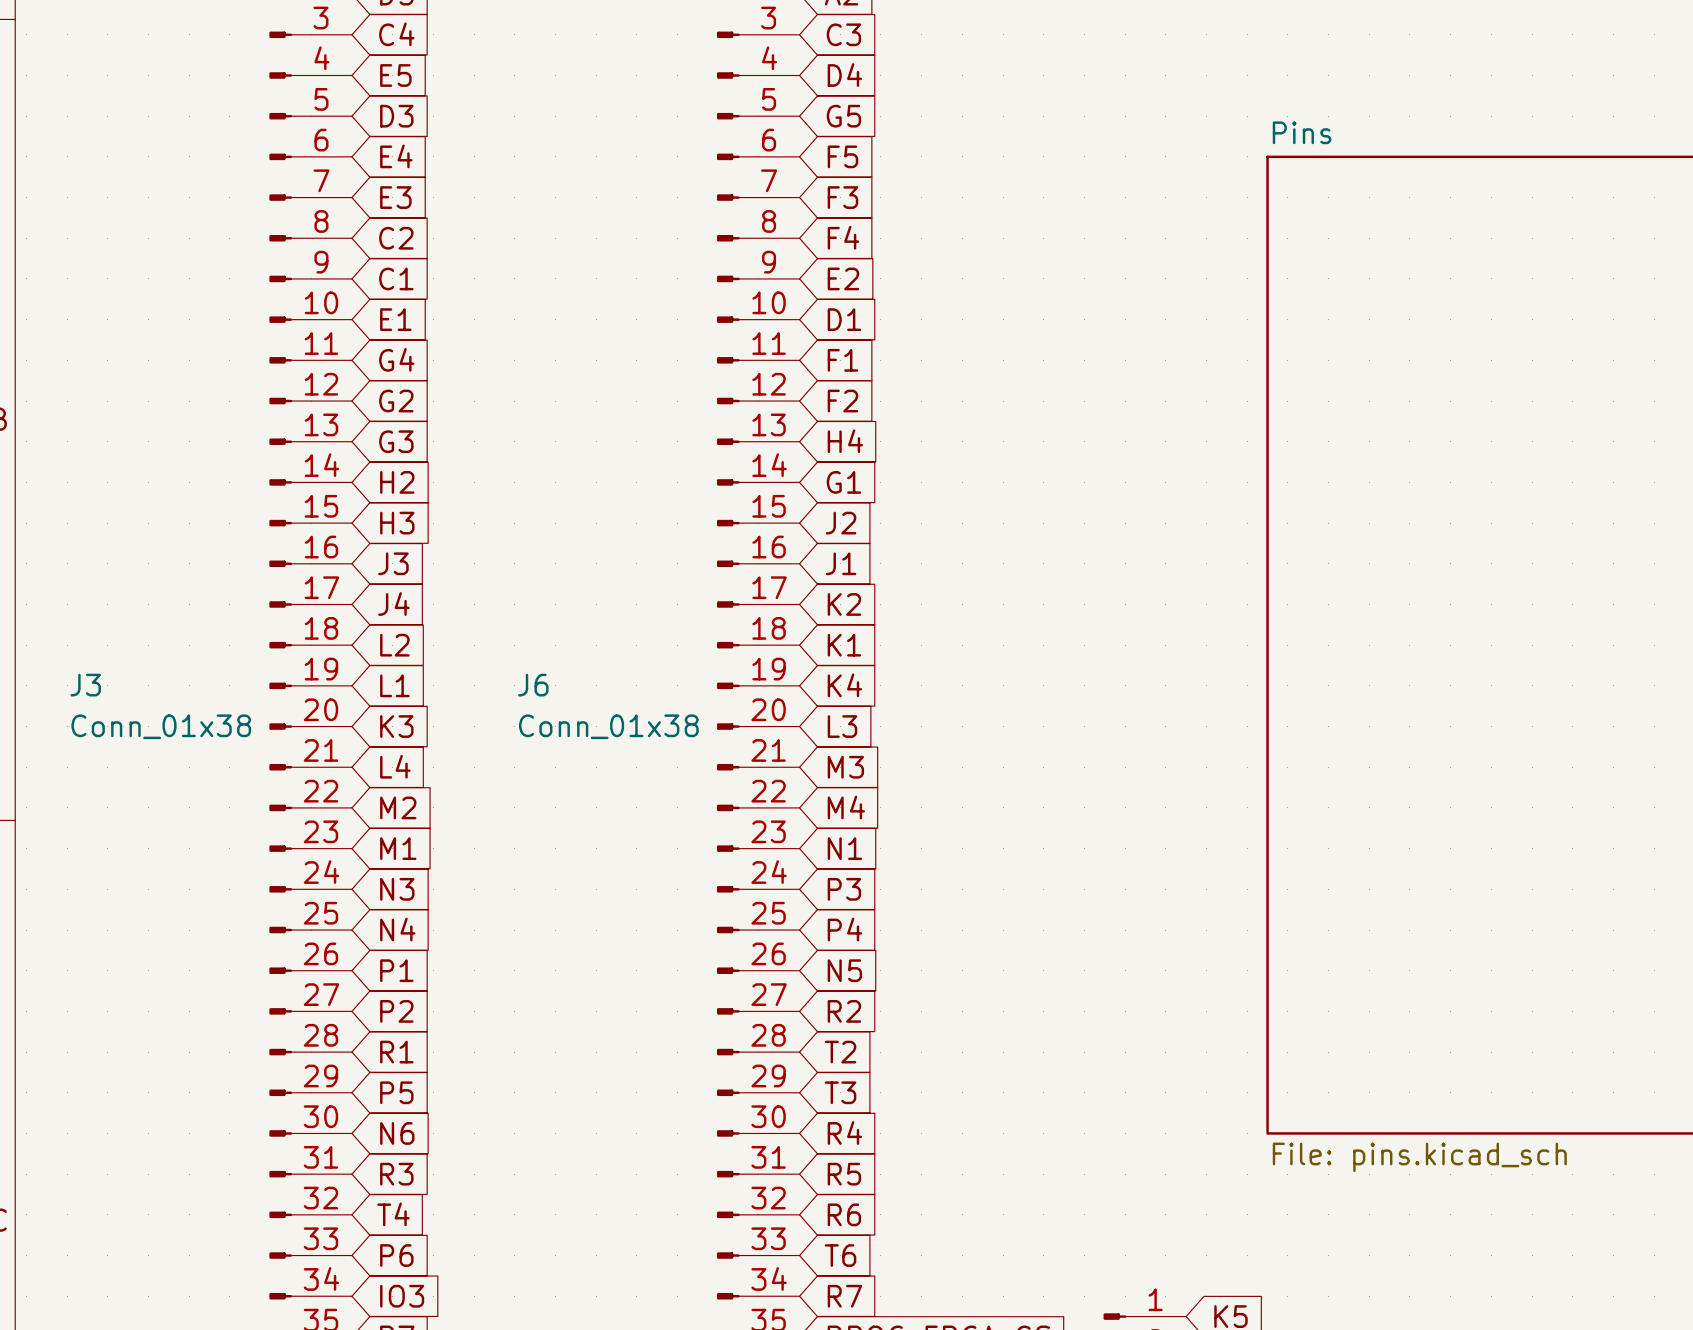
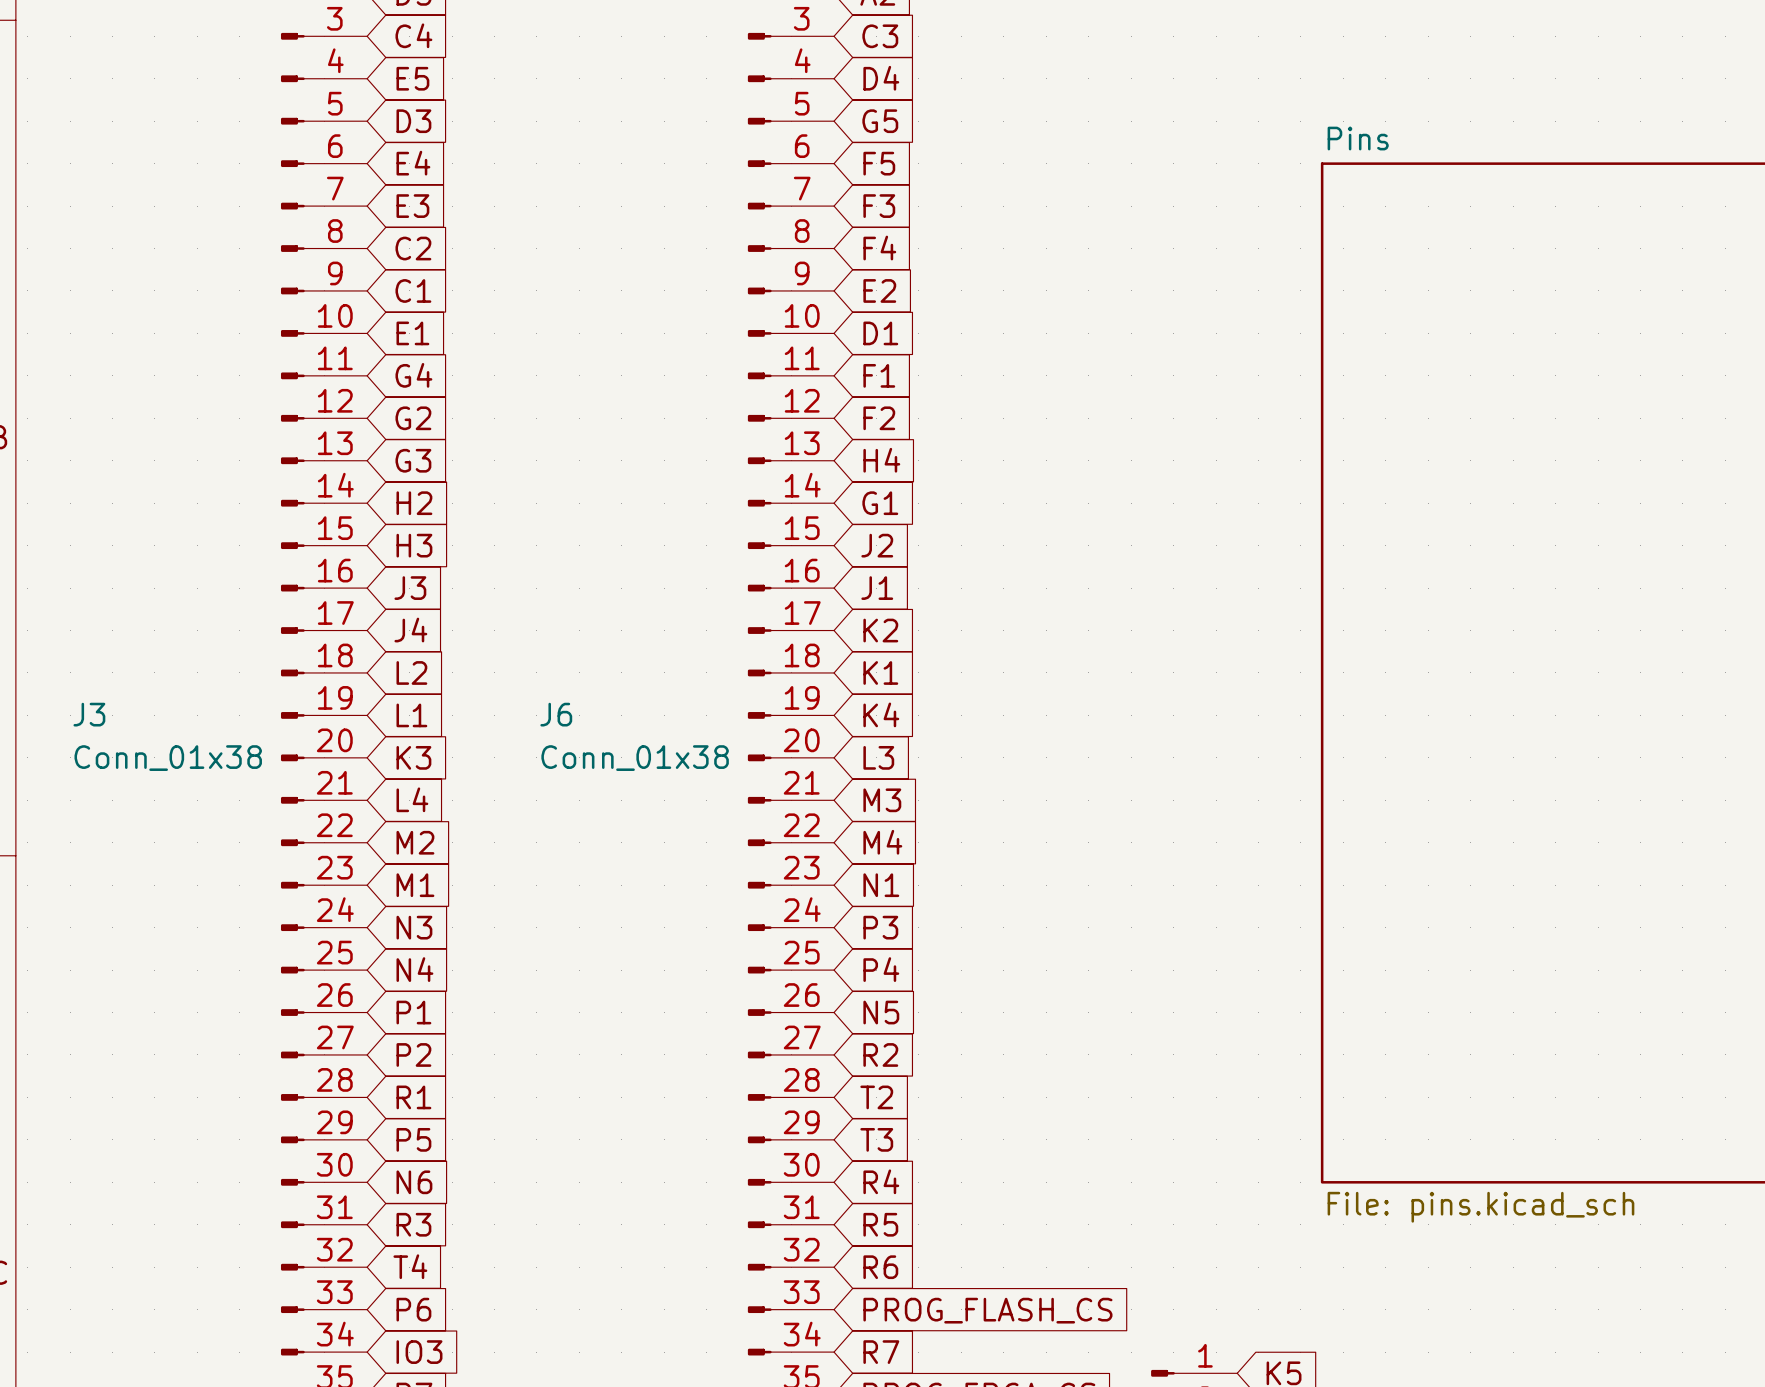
global label: T6 (840, 1255) -> PROG_FLASH_CS (987, 1310)

